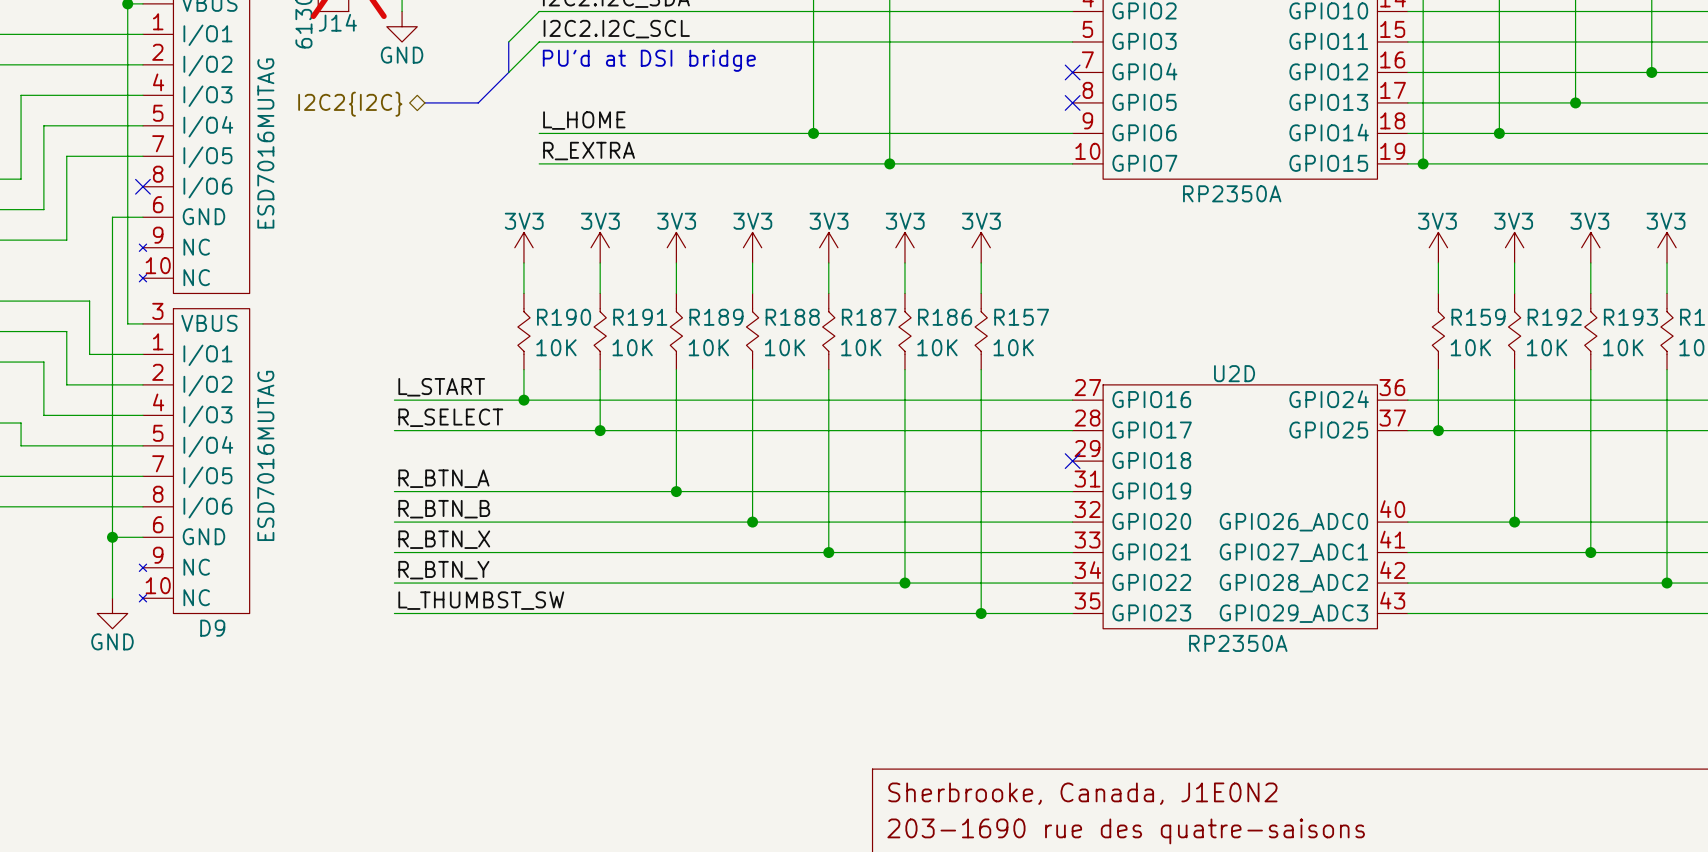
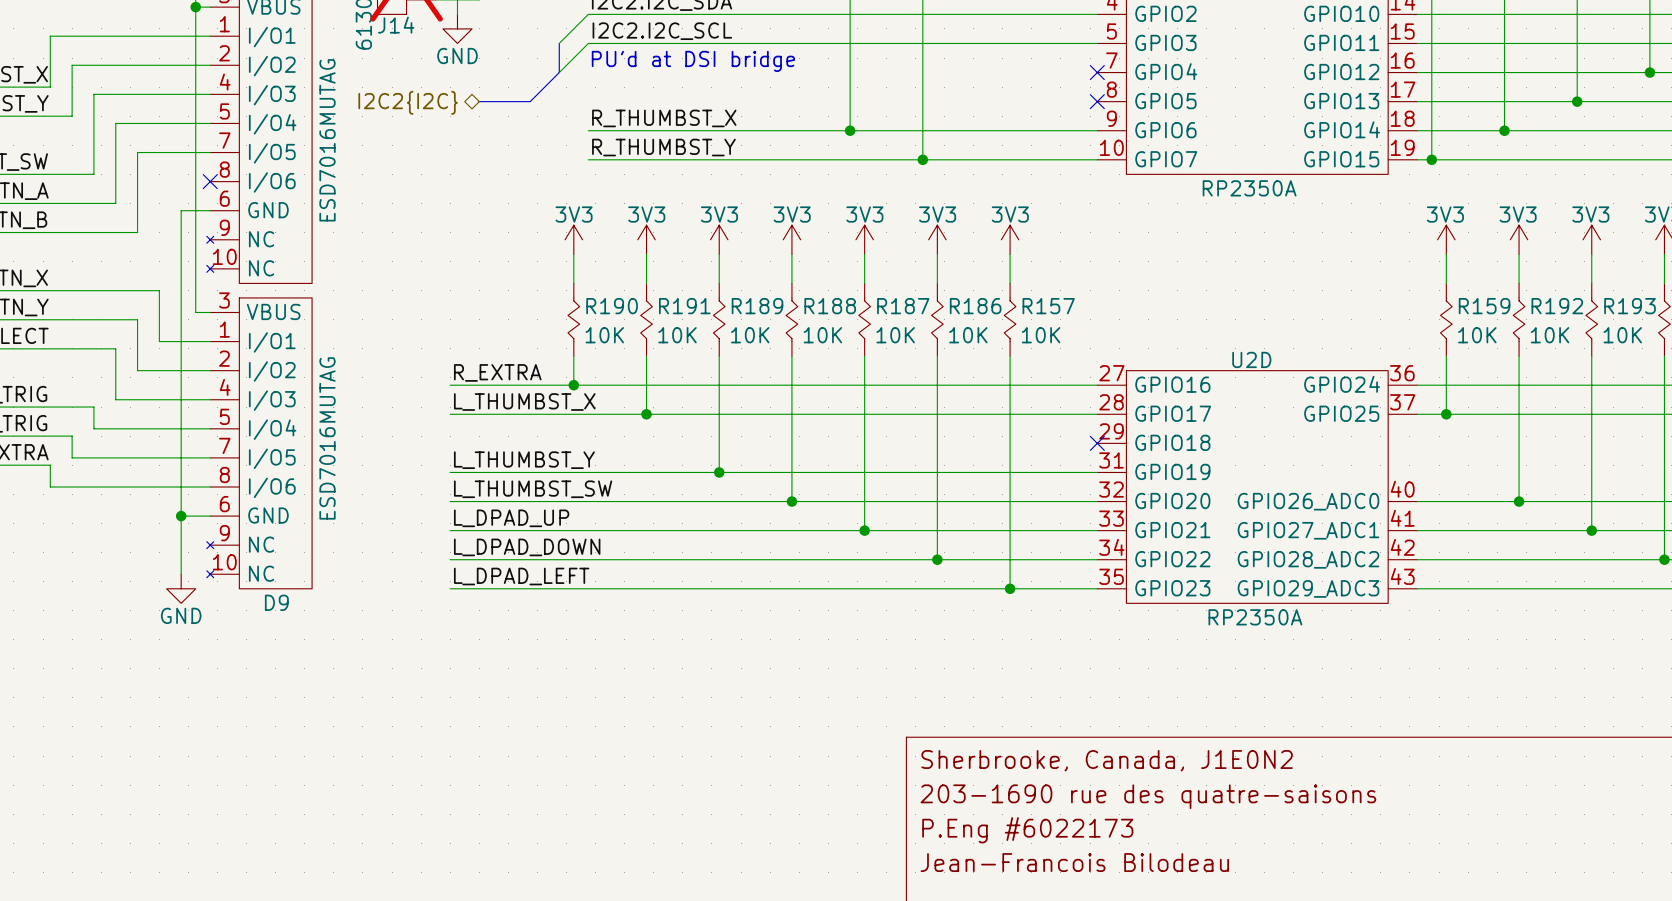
label: L_HOME (584, 120) -> R_THUMBST_X (664, 118)
label: R_EXTRA (589, 151) -> R_THUMBST_Y (663, 147)
label: L_START (441, 387) -> R_EXTRA (497, 372)
label: R_SELECT (450, 417) -> L_THUMBST_X (524, 402)
label: R_BTN_A (443, 478) -> L_THUMBST_Y (524, 460)
label: R_BTN_B (444, 509) -> L_THUMBST_SW (533, 489)
label: R_BTN_X (444, 539) -> L_DPAD_UP (511, 518)
label: R_BTN_Y (443, 570) -> L_DPAD_DOWN (527, 547)
label: L_THUMBST_SW (481, 600) -> L_DPAD_LEFT (521, 576)

